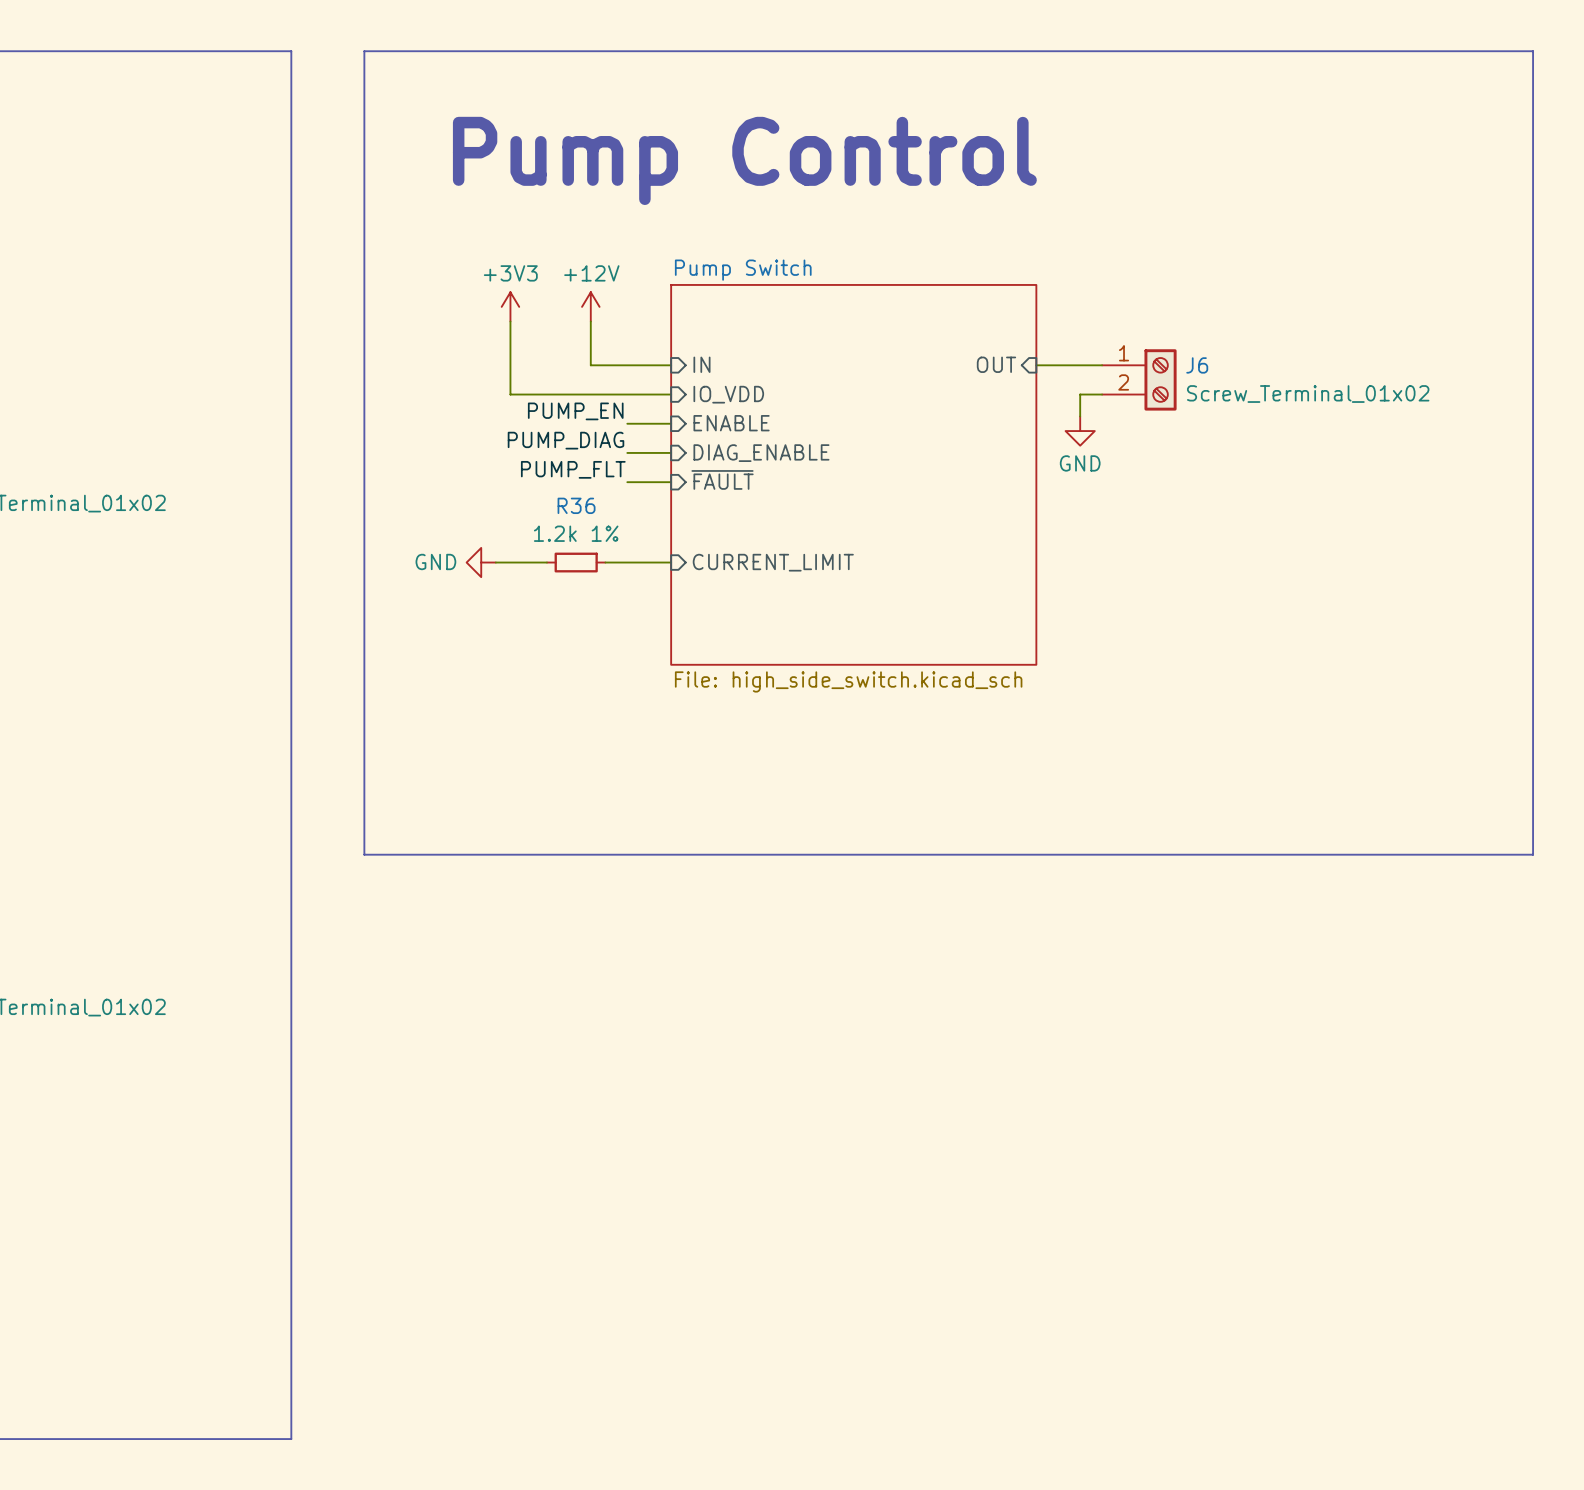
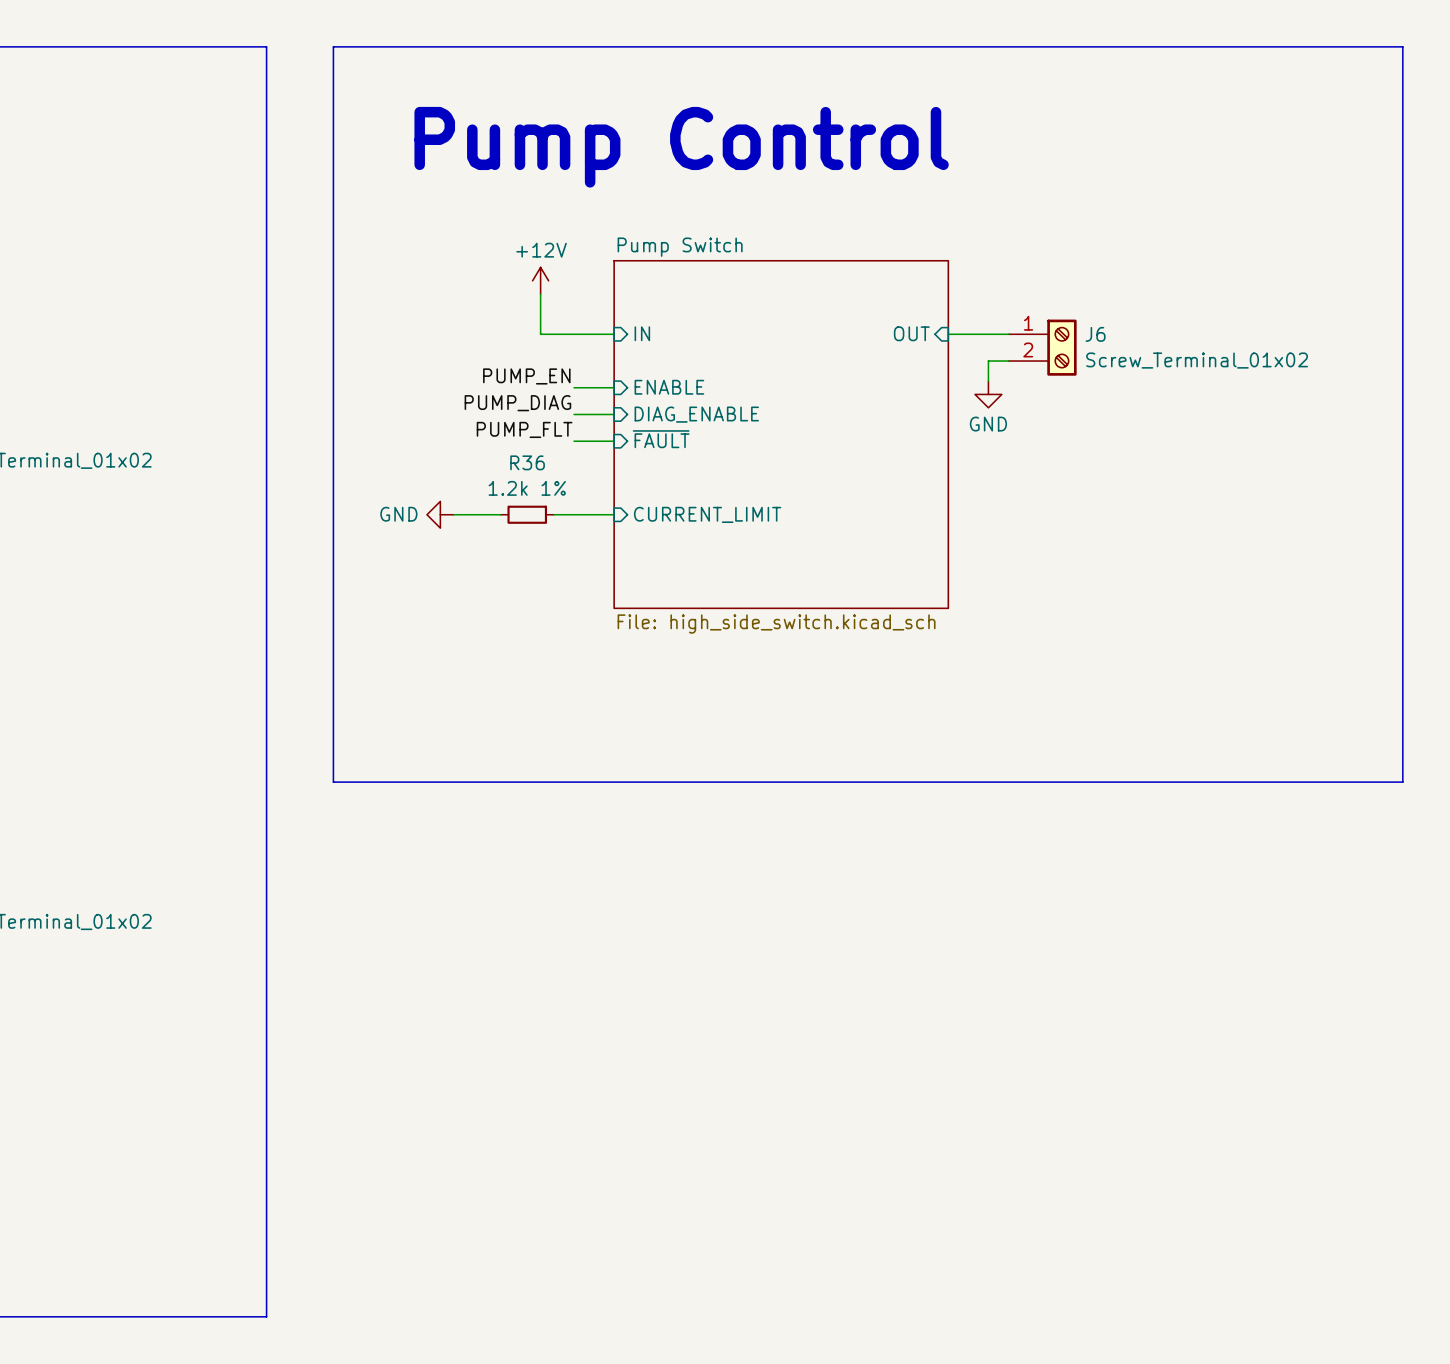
power symbol: +3V3 (510, 306) -> none
wire: (510, 321) (510, 394) (671, 394) -> none
sheet pin: IO_VDD (728, 394) -> none

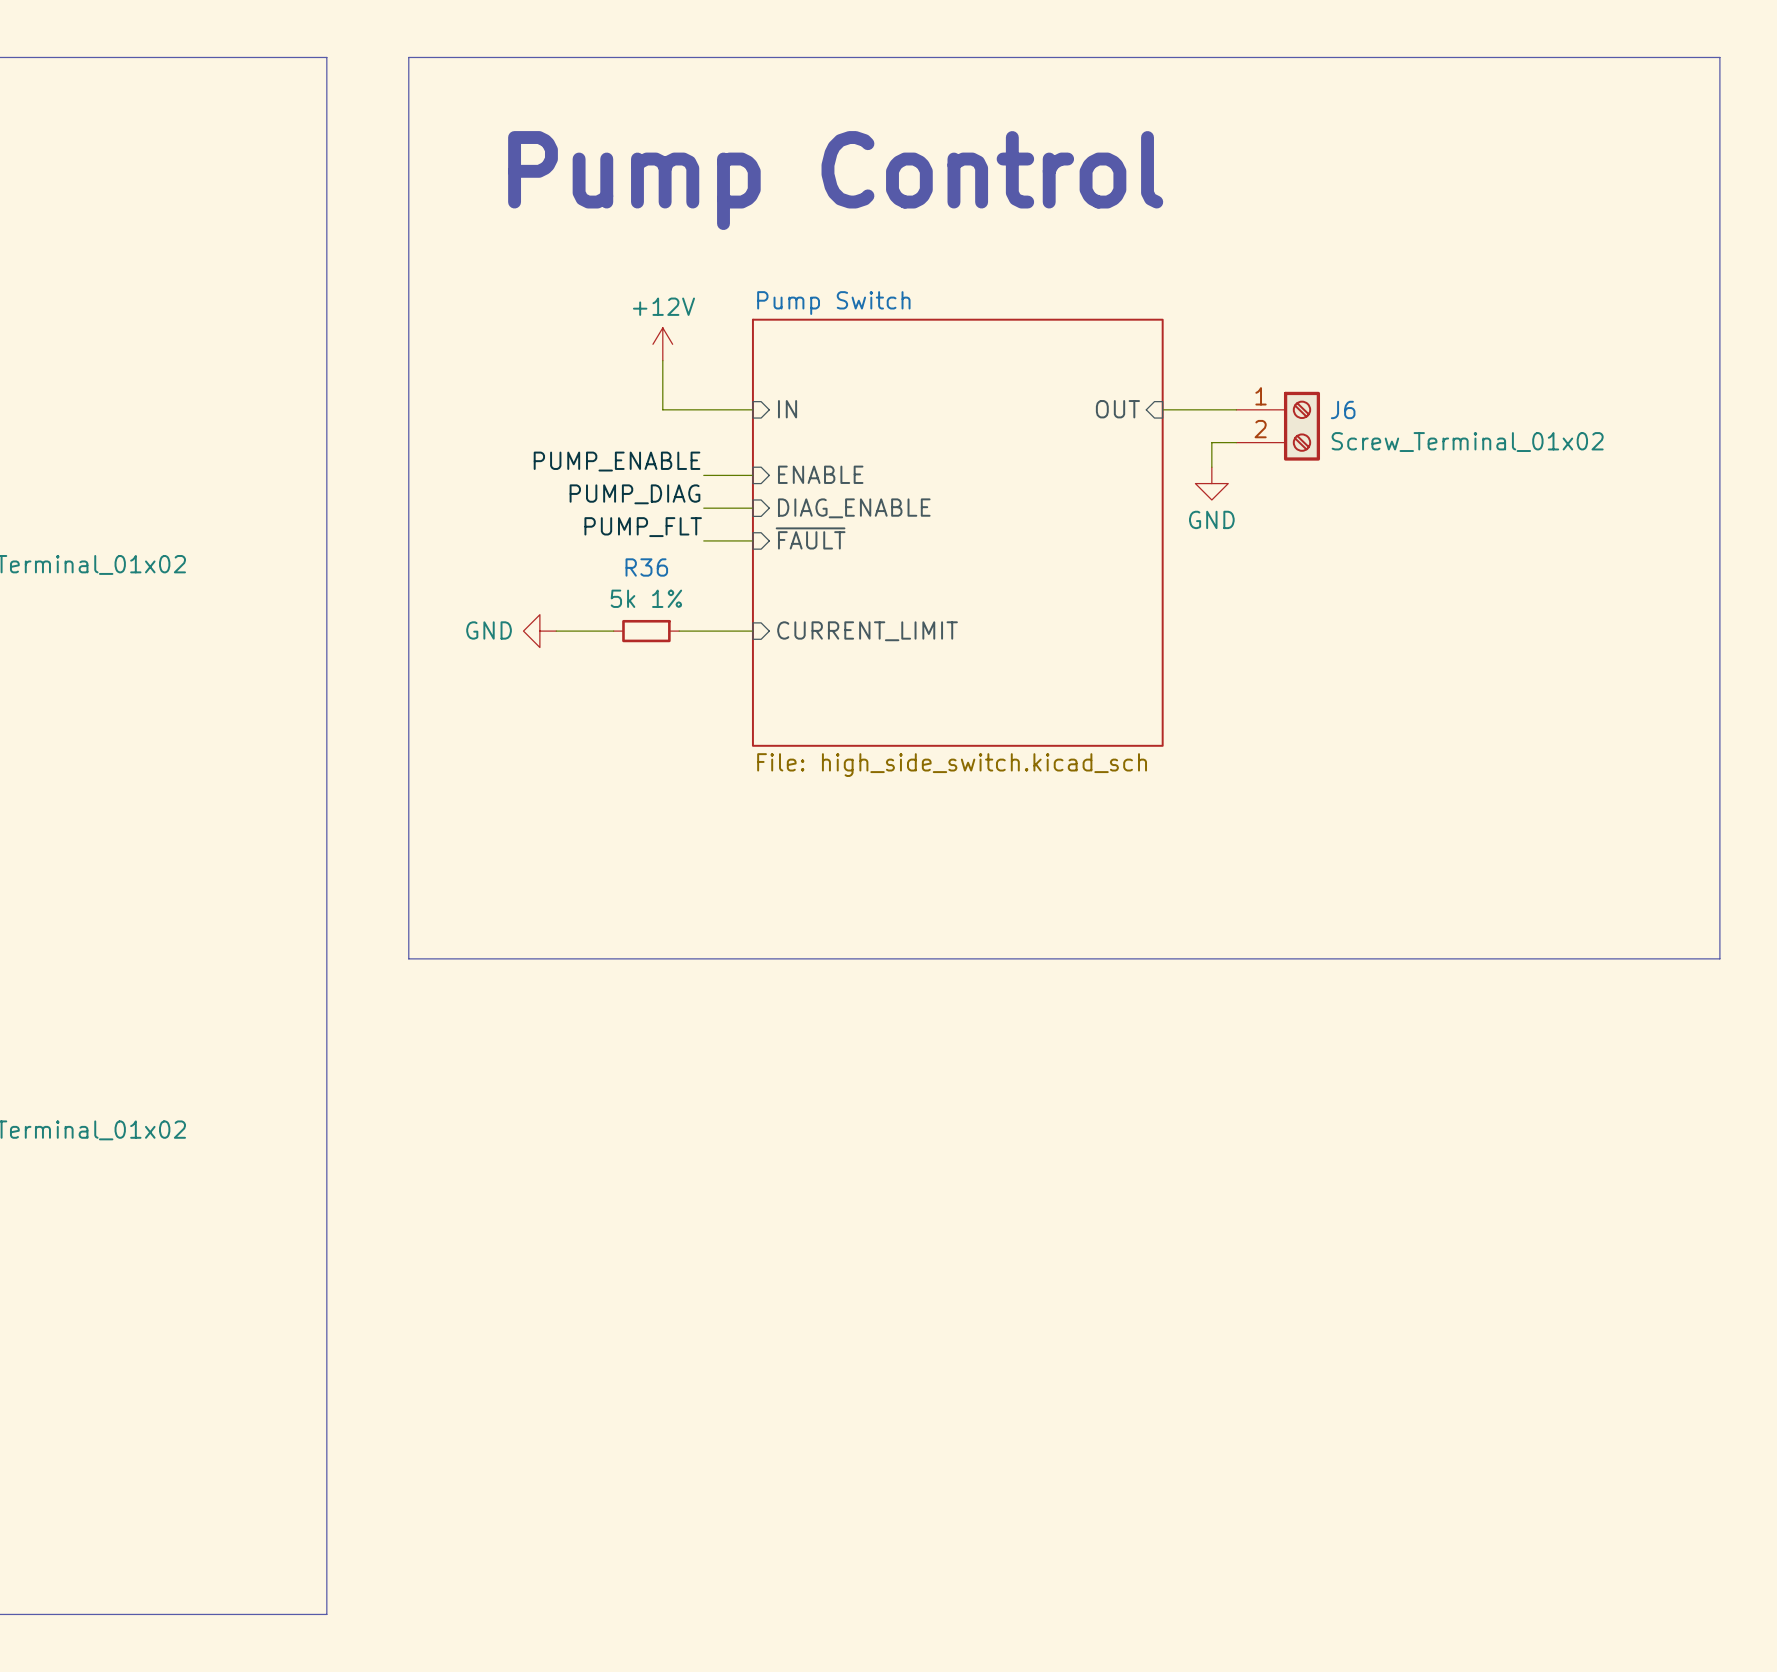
label: PUMP_EN (526, 376) -> PUMP_ENABLE (617, 461)
R36 value: 1.2k 1% (527, 488) -> 5k 1% (646, 598)

